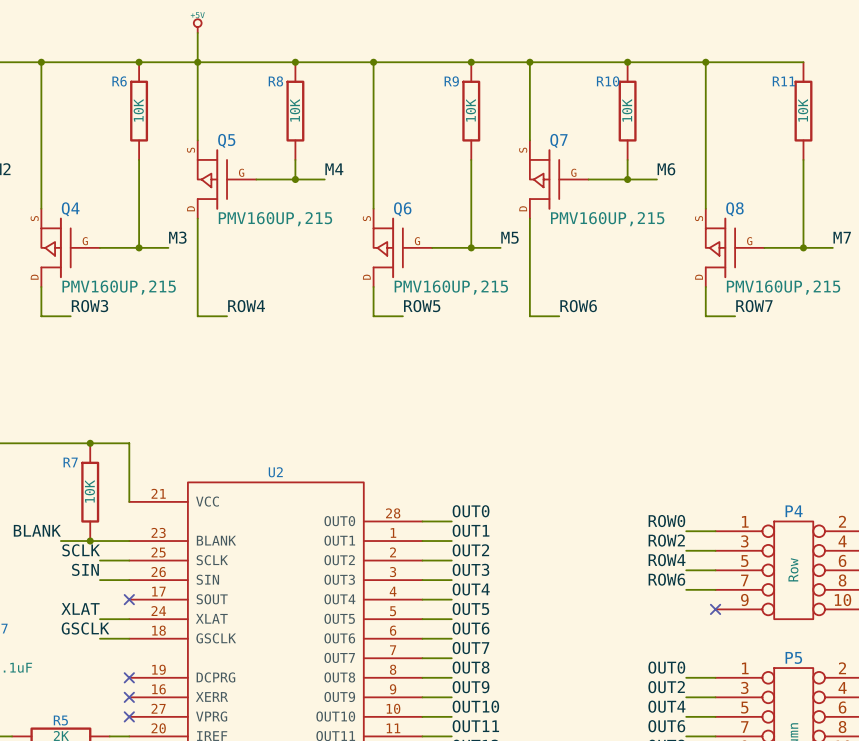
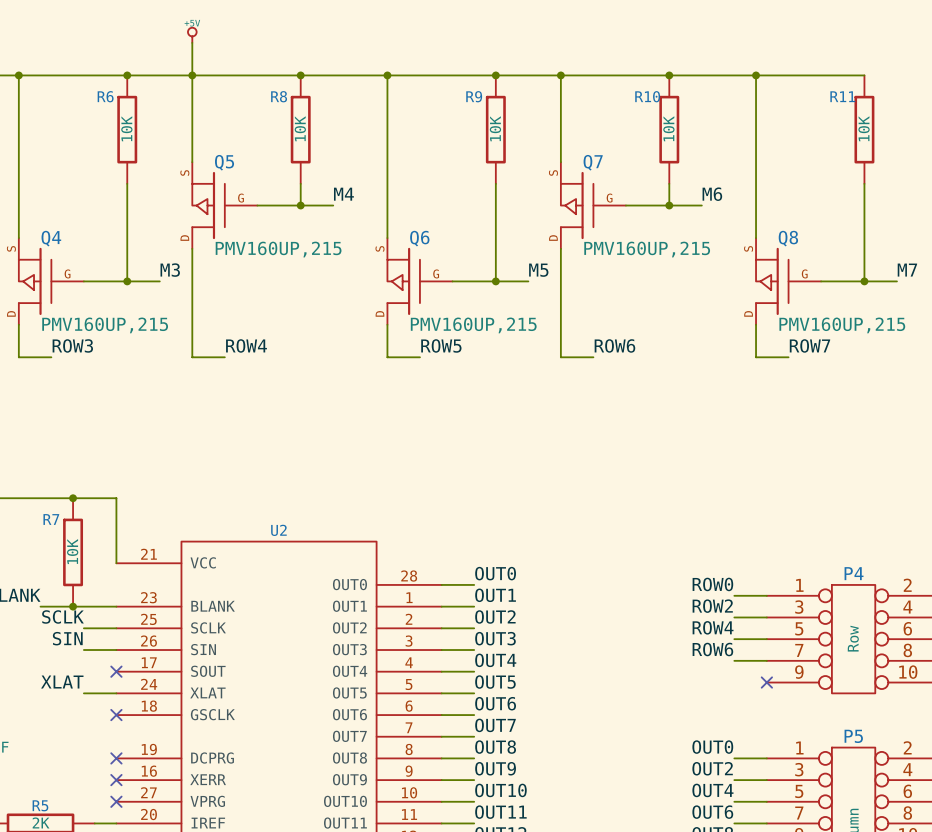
label: GSCLK (85, 628) -> none
wire: (100, 638) (129, 638) -> none
no-connect mark: none -> (116, 715)

